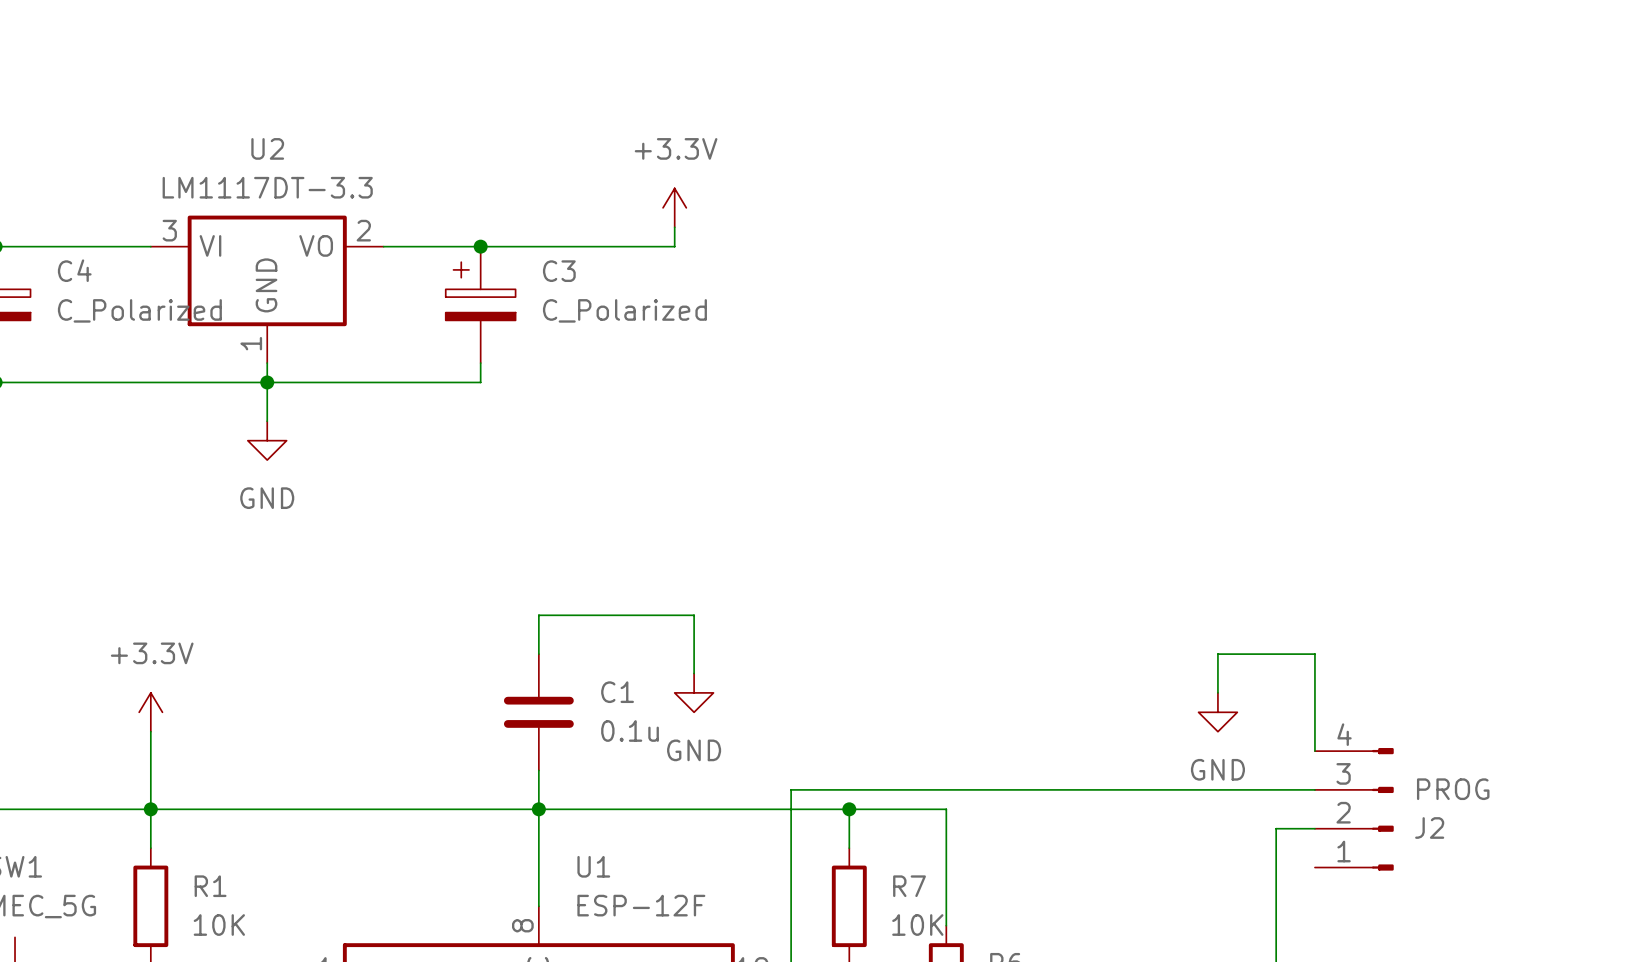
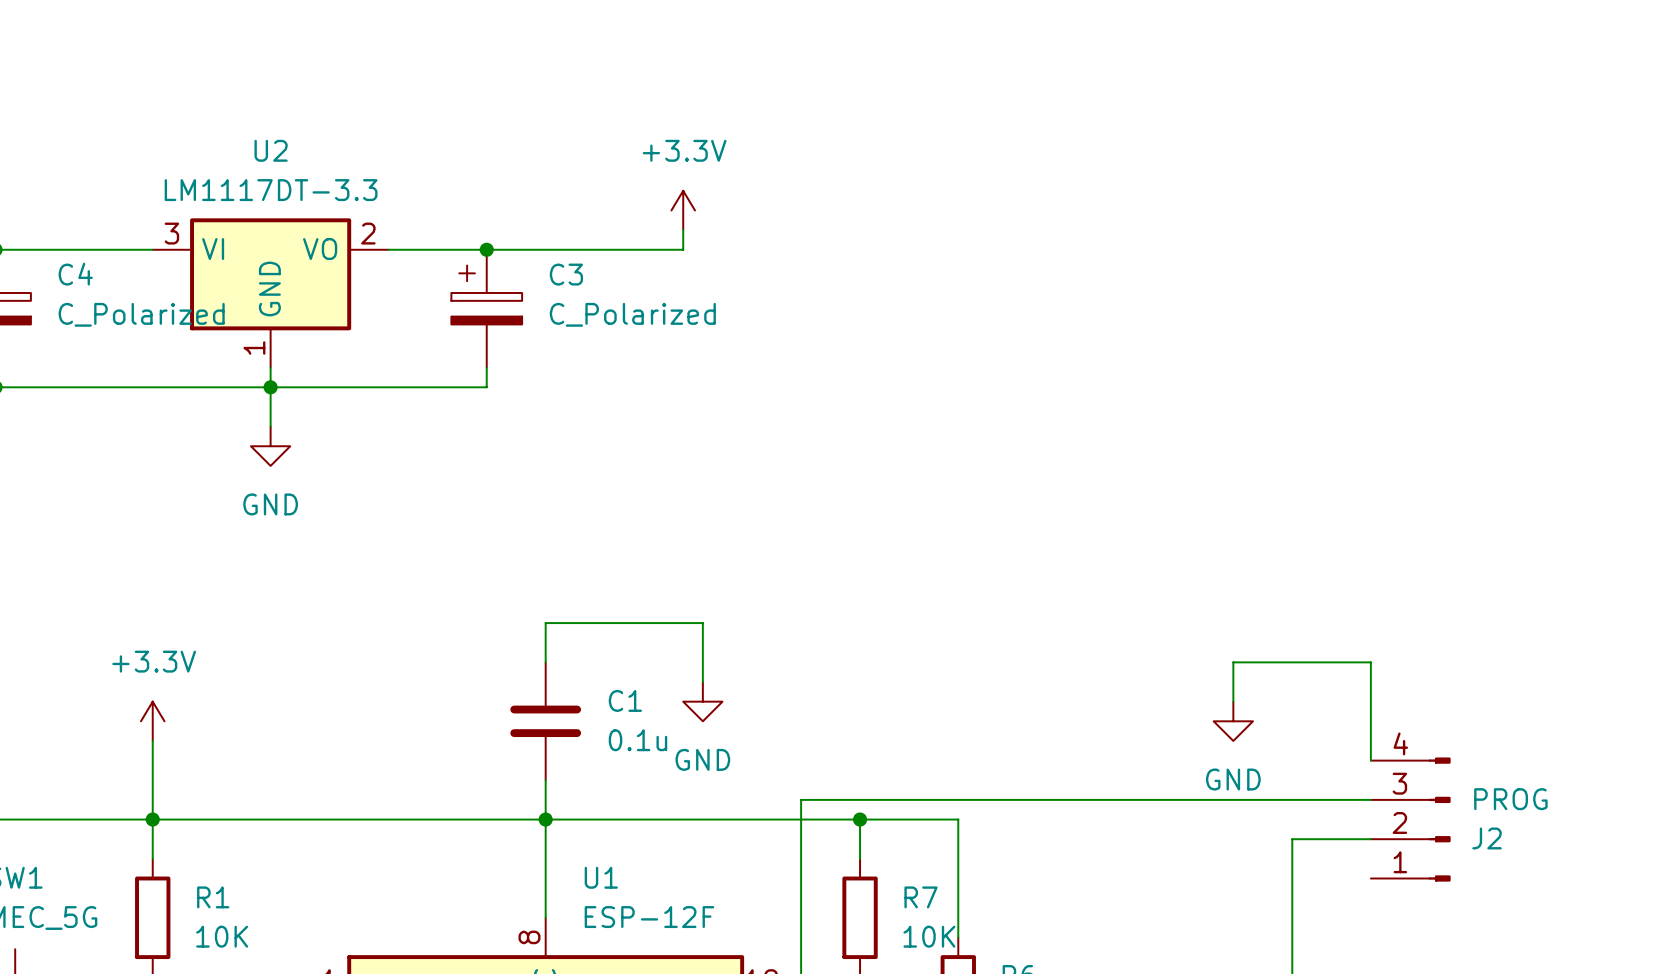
wire: (1314, 654) (1314, 751) -> (1331, 662) (1370, 662) (1370, 760)
J2 position: (1354, 809) -> (1410, 819)

